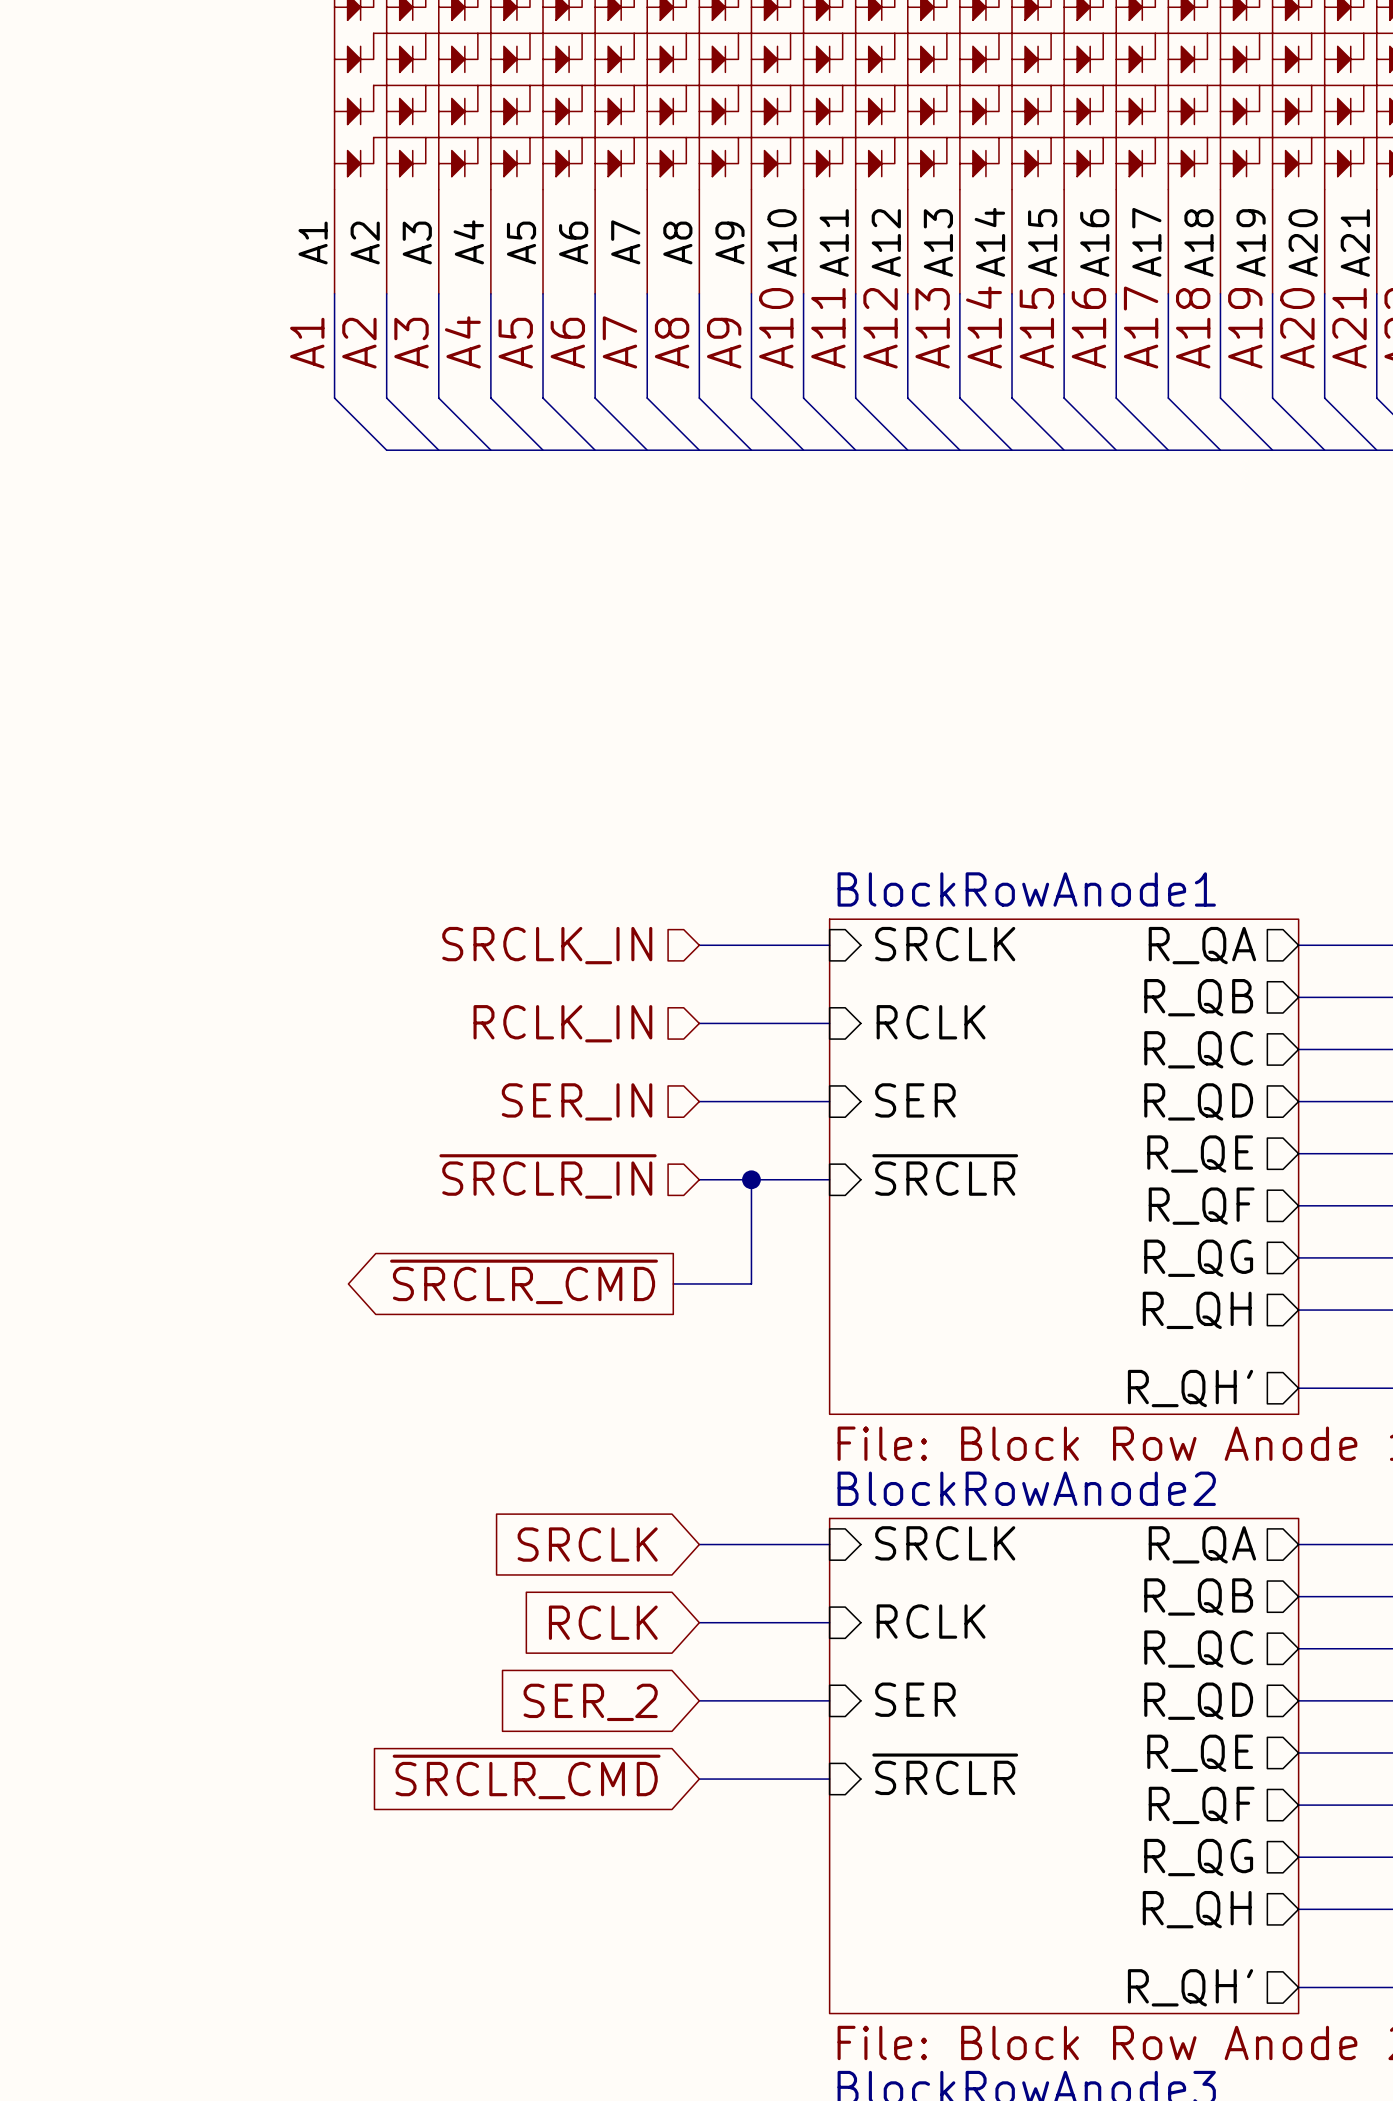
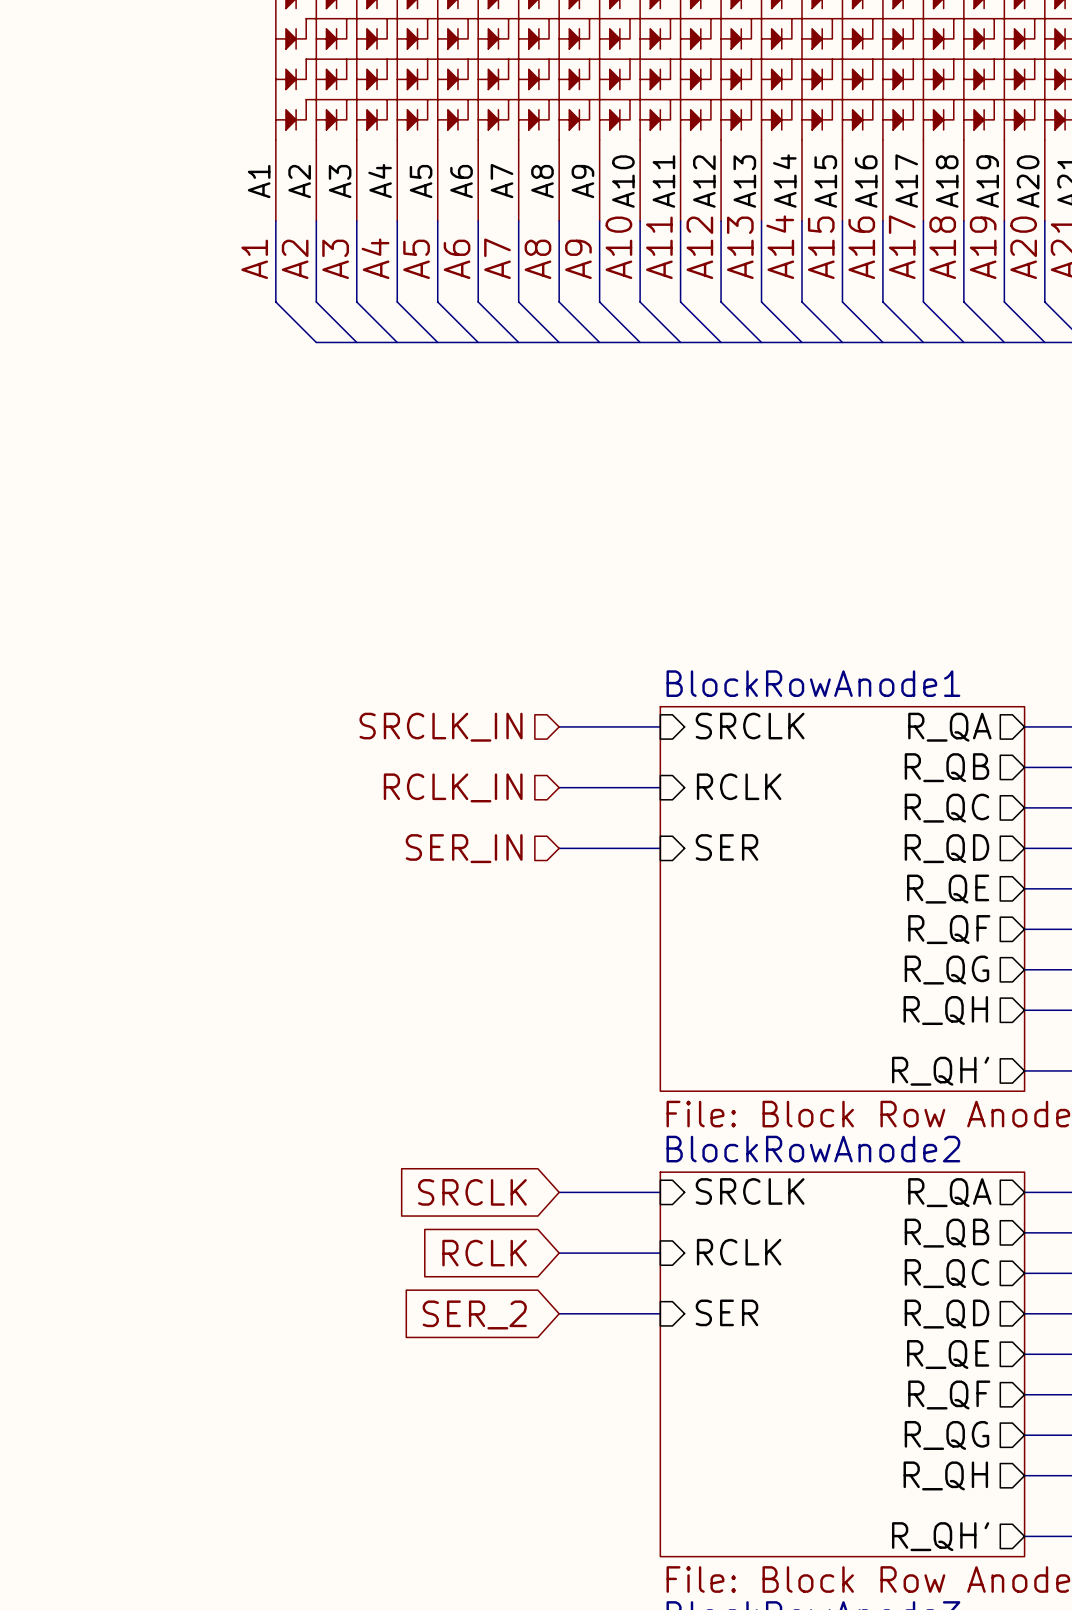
sheet pin: ~{SRCLR} (945, 1174) -> none
hierarchical label: ~{SRCLR_IN} (548, 1176) -> none
wire: (699, 1179) (829, 1179) -> none
wire: (751, 1179) (751, 1283) (673, 1283) -> none
junction: (751, 1179) -> none
global label: ~{SRCLR_CMD} (524, 1281) -> none
sheet pin: ~{SRCLR} (945, 1774) -> none
global label: ~{SRCLR_CMD} (526, 1776) -> none
wire: (699, 1779) (829, 1779) -> none

